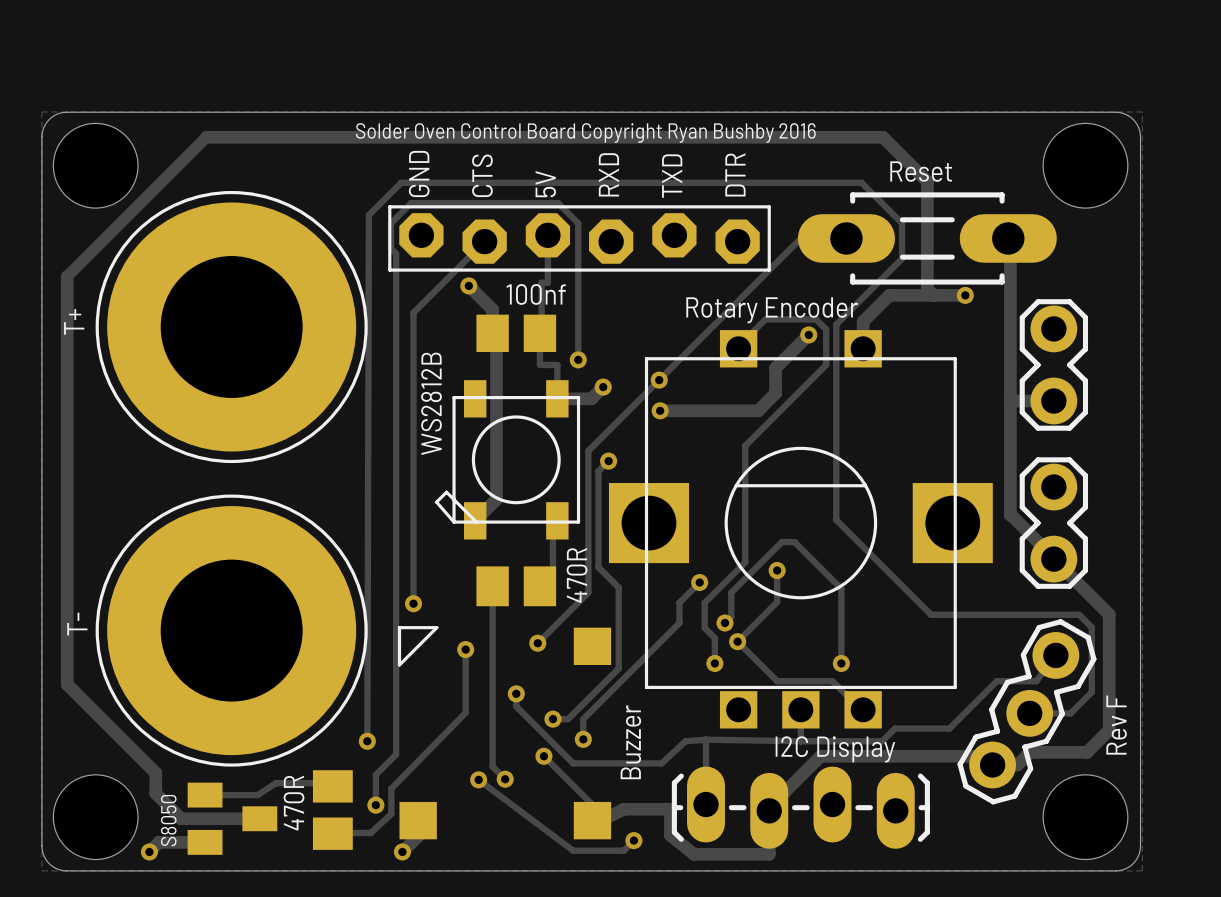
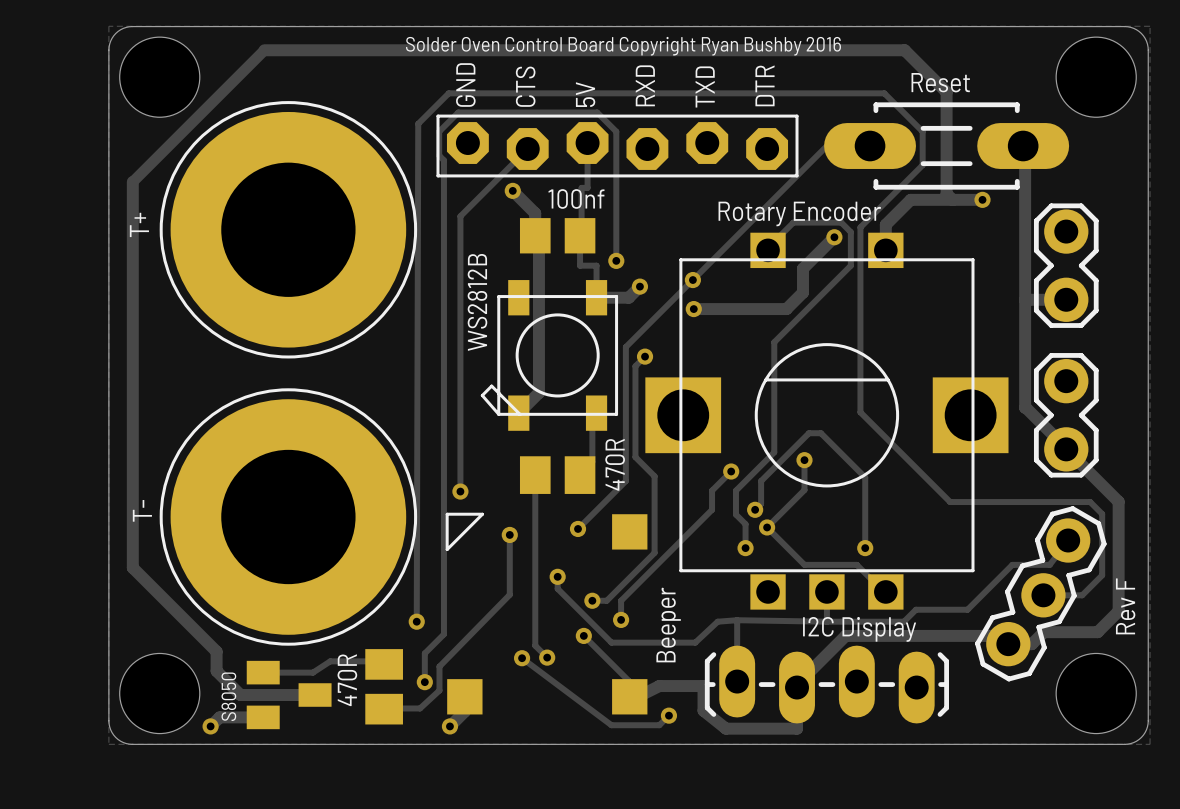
text: Buzzer (630, 742) -> Beeper (668, 625)

